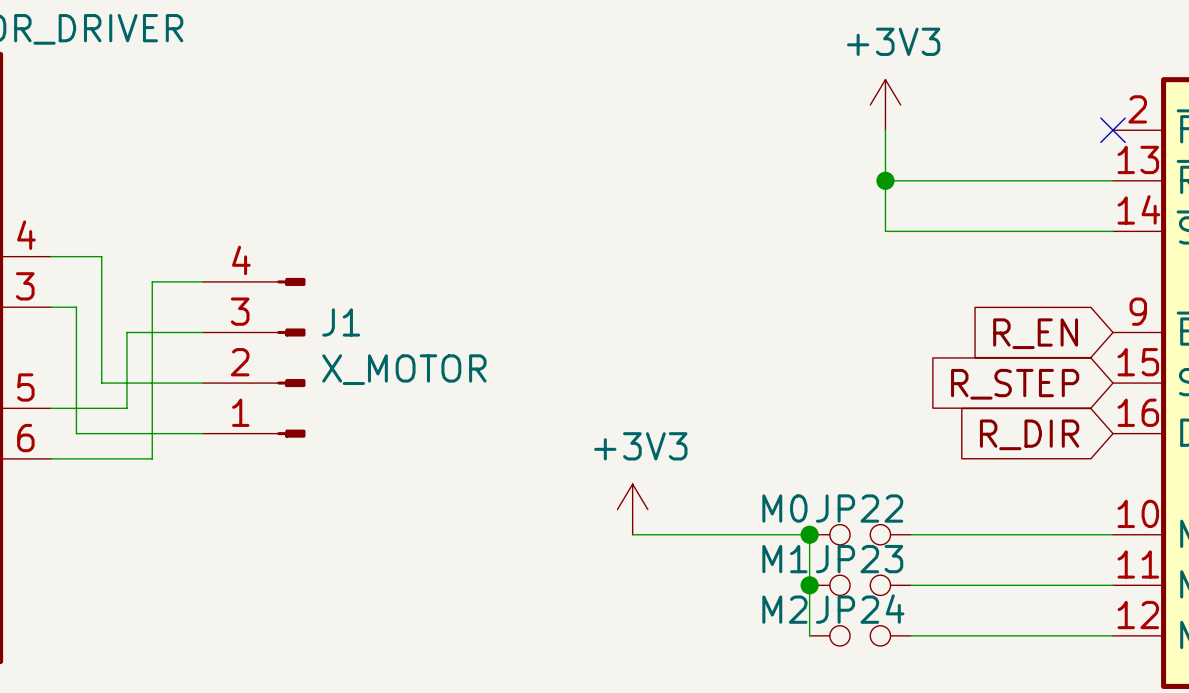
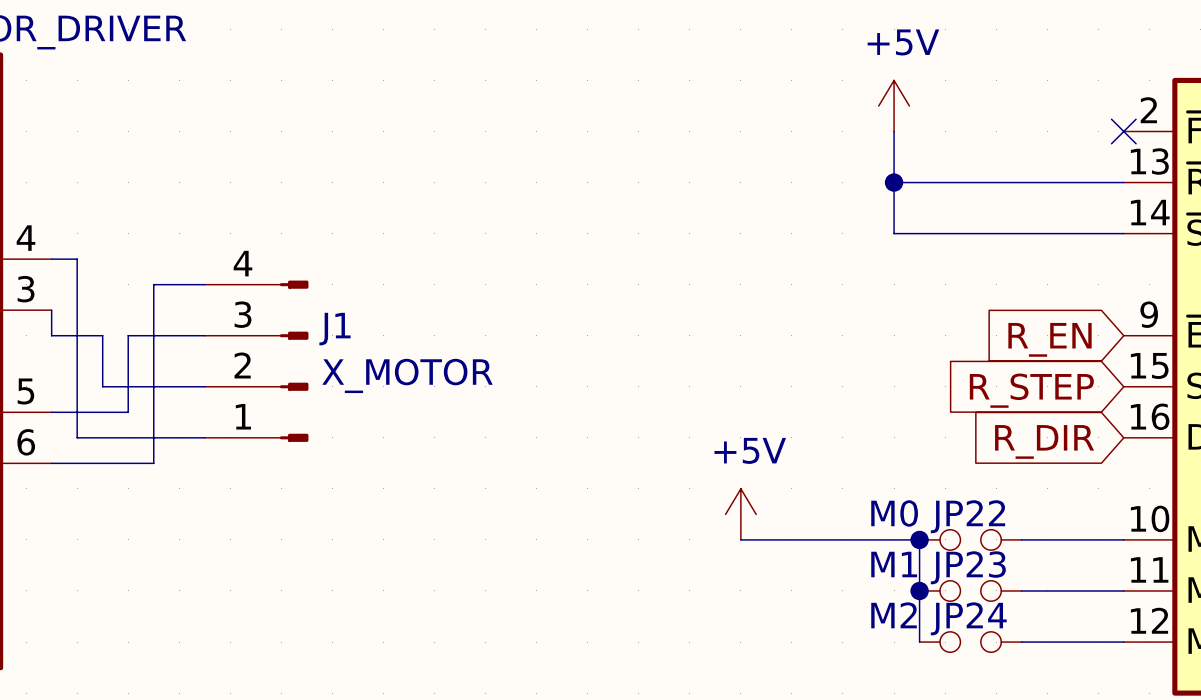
power symbol: +3V3 (885, 104) -> +5V (894, 105)
wire: (76, 256) (101, 256) (101, 332) -> (77, 259) (77, 310)
wire: (51, 307) (76, 307) -> (51, 310) (51, 335) (102, 335)
power symbol: +3V3 (632, 509) -> none
power symbol: none -> +5V (740, 514)
wire: (632, 534) (733, 534) -> none
wire: (809, 534) (809, 635) -> (817, 539) (919, 539) (919, 642)
junction: (809, 534) -> none
JP22 position: (860, 534) -> (970, 539)
wire: (910, 534) (1011, 534) -> none
junction: none -> (919, 539)
junction: (809, 585) -> none
JP23 position: (860, 585) -> (970, 590)
wire: (910, 585) (1011, 585) -> none
junction: none -> (919, 590)
JP24 position: (860, 635) -> (970, 642)
wire: (910, 635) (1011, 635) -> none

